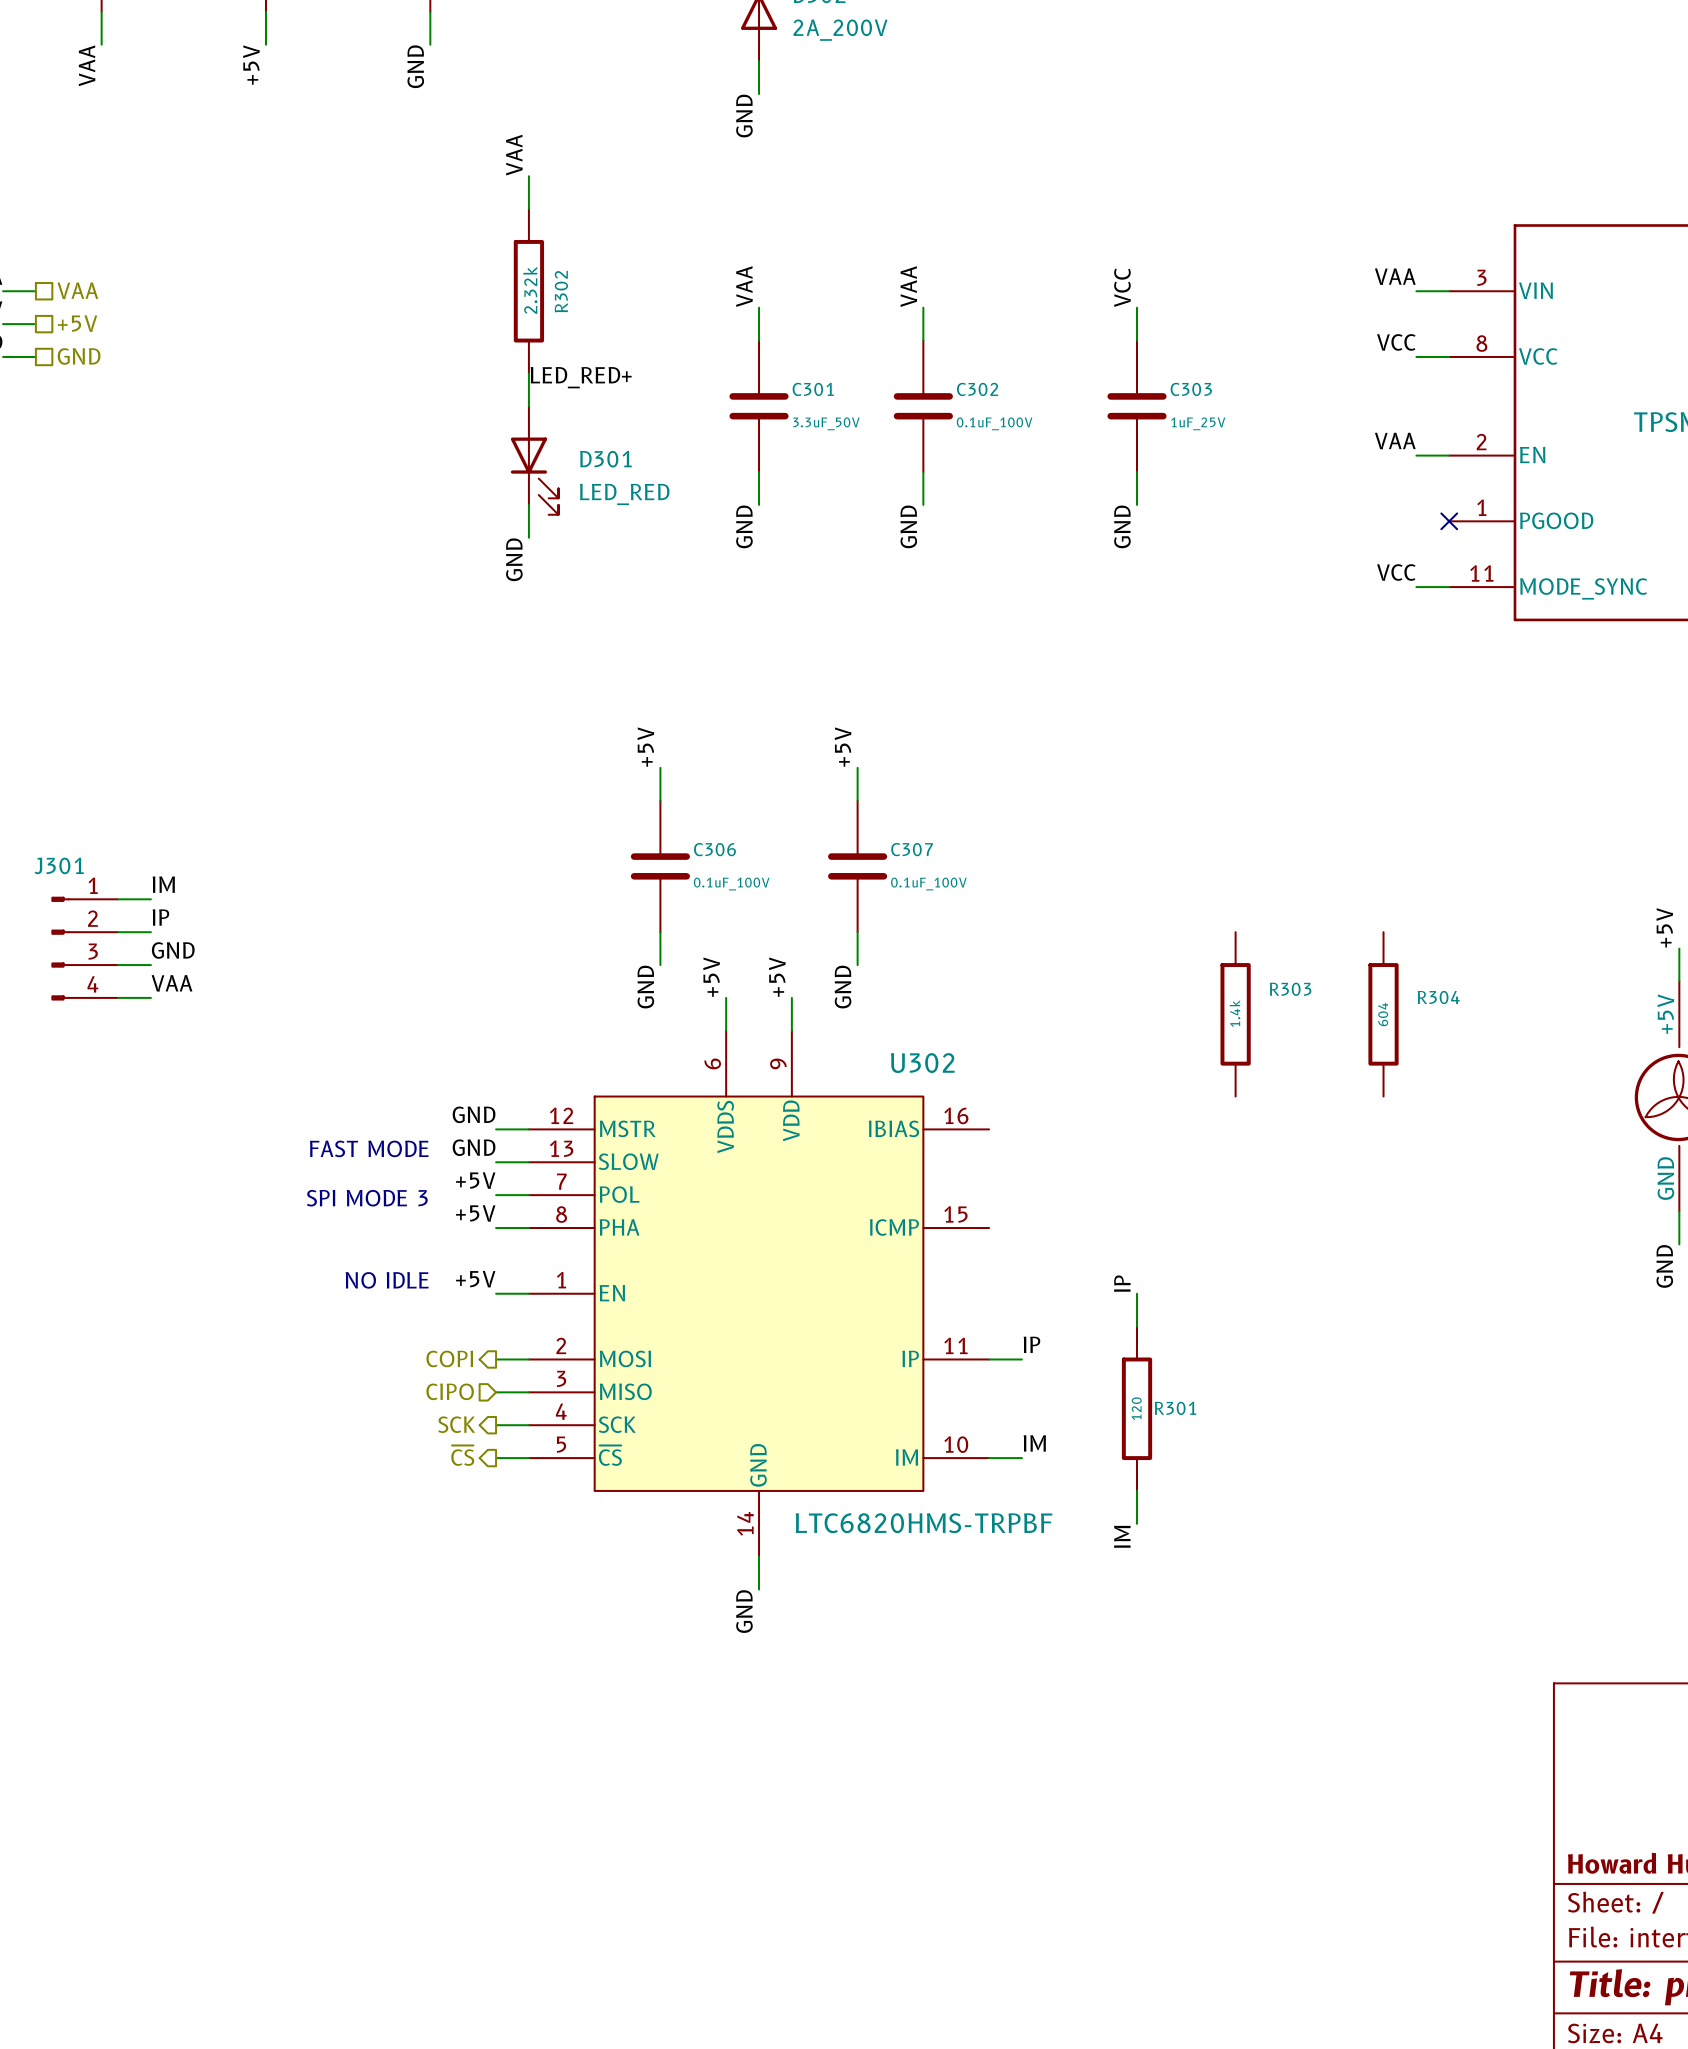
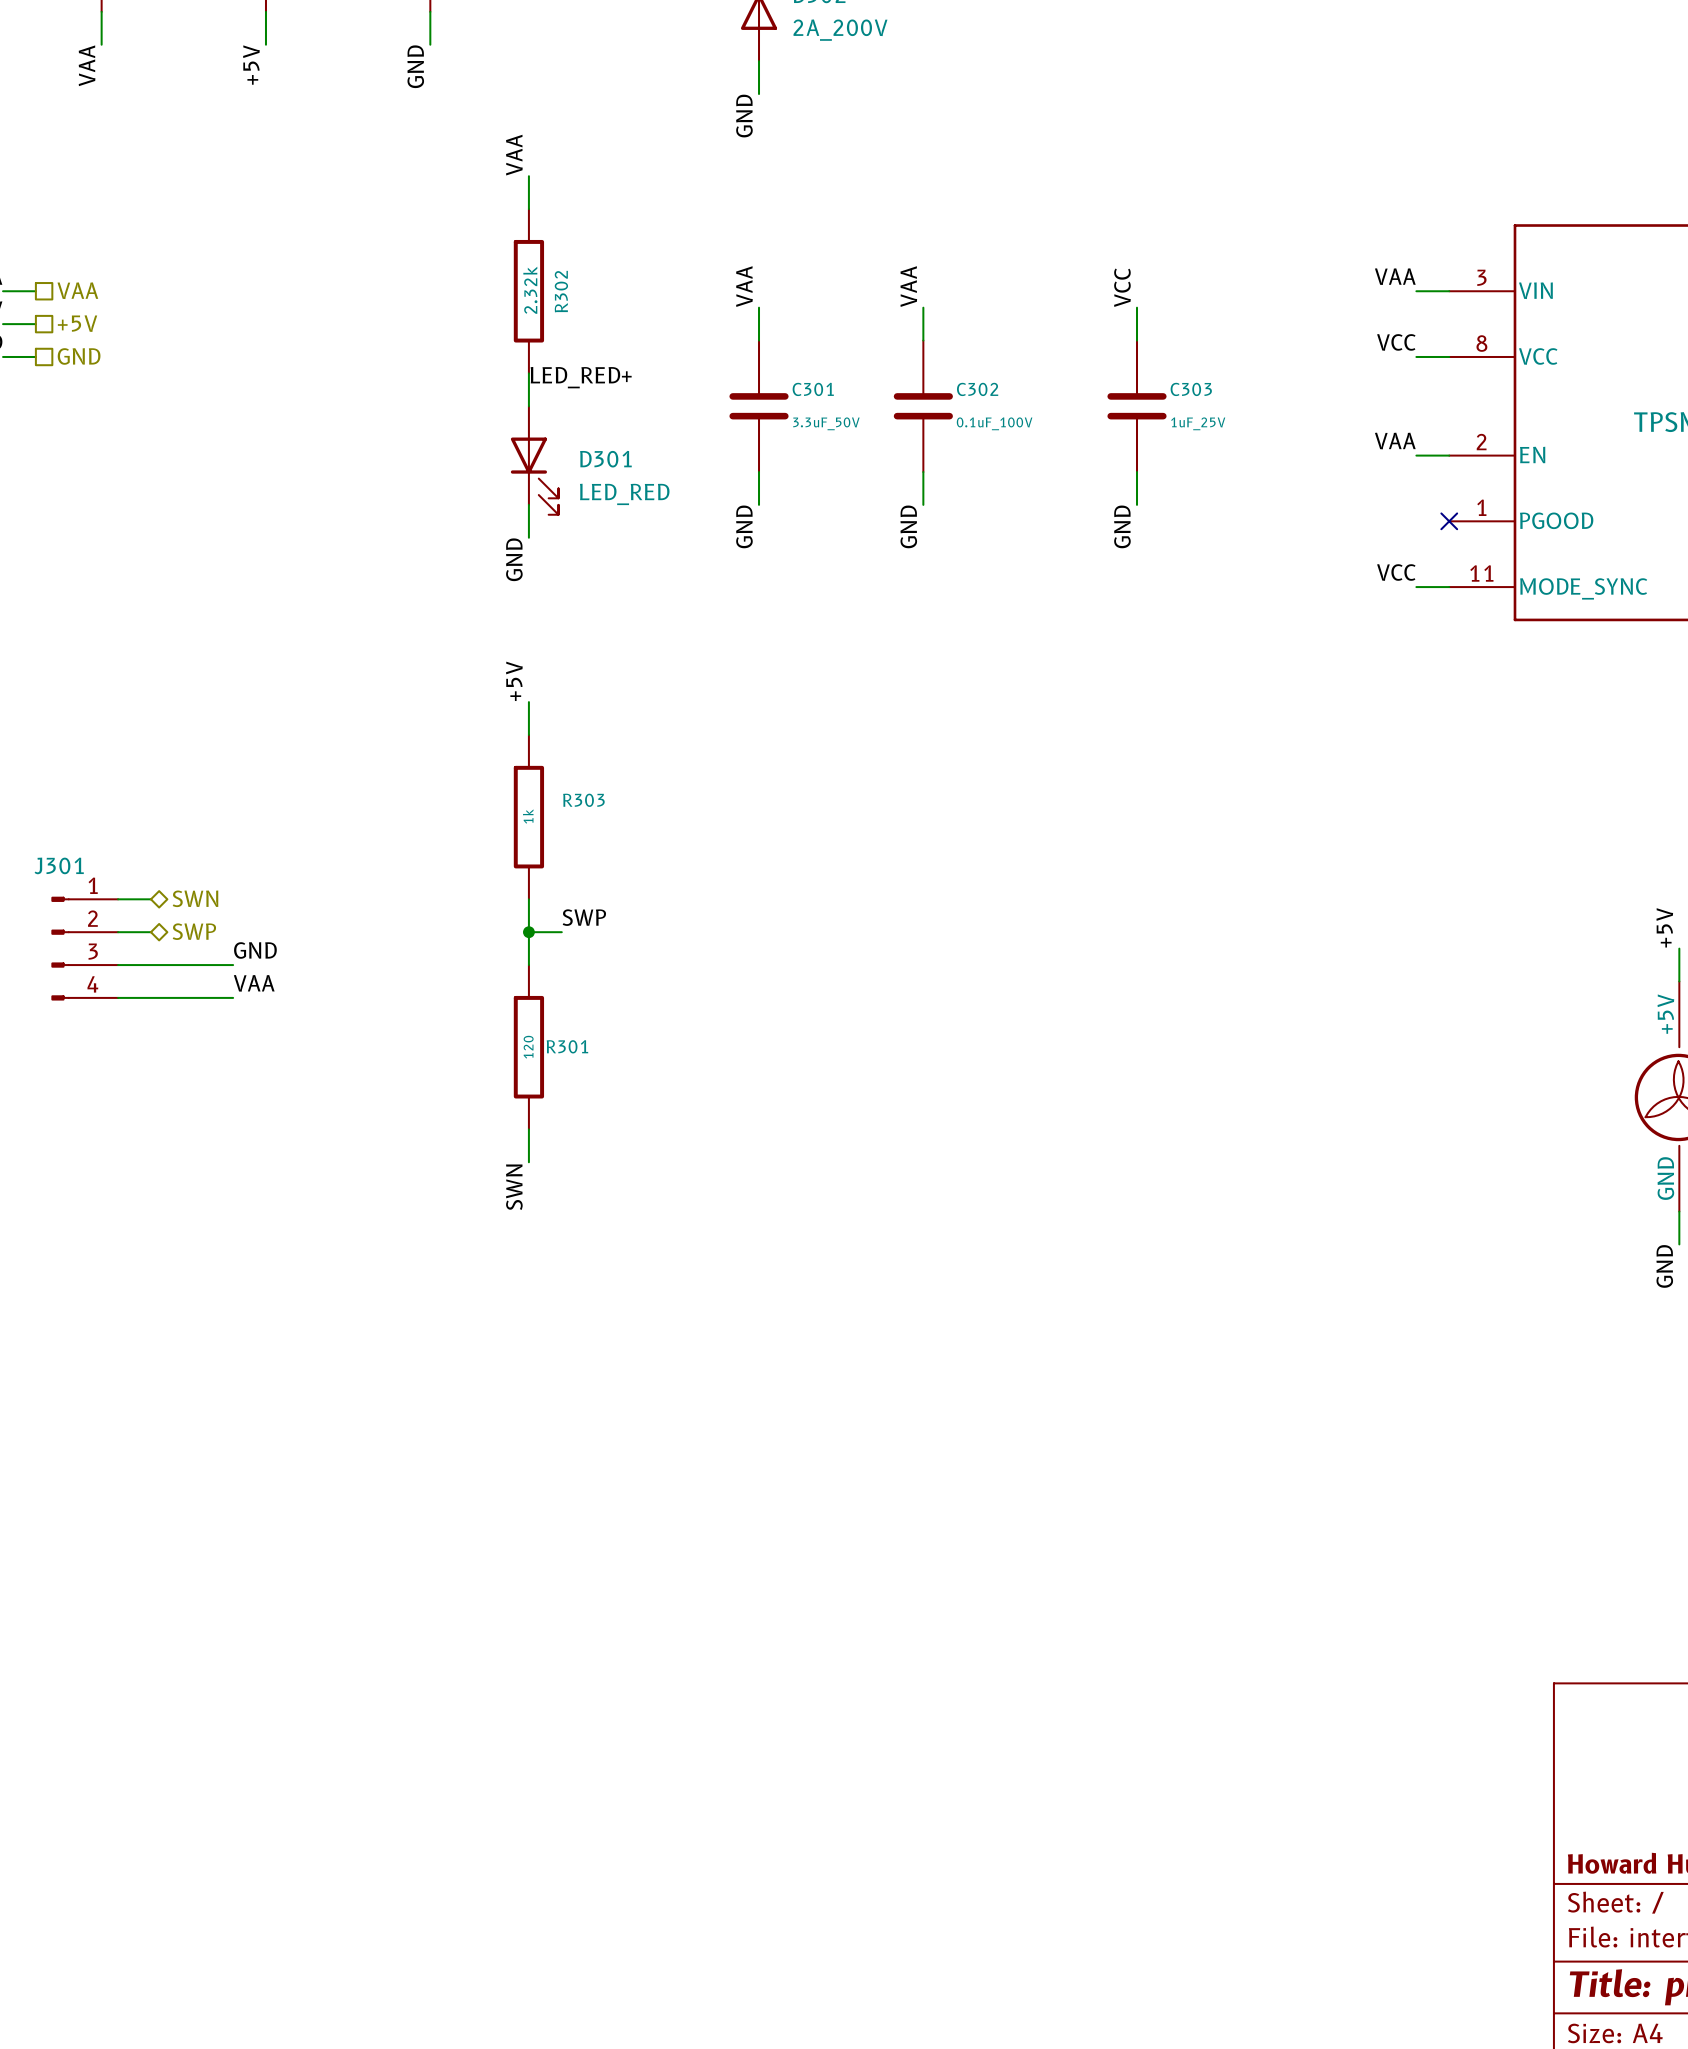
label position: +5V (645, 747) -> +5V (514, 681)
label: +5V (843, 747) -> none
wire: (660, 767) (660, 800) -> (528, 702) (528, 734)
wire: (857, 767) (857, 800) -> none
C306: 0.1uF_100V (660, 866) -> none
C307: 0.1uF_100V (857, 866) -> none
label: IM (163, 884) -> none
hierarchical label: none -> SWN (195, 898)
wire: none -> (528, 899) (528, 965)
label: IP (160, 917) -> none
label: none -> SWP (584, 917)
hierarchical label: none -> SWP (194, 931)
junction: none -> (528, 932)
wire: (660, 932) (660, 965) -> none
wire: (857, 932) (857, 965) -> none
label position: GND (173, 950) -> GND (255, 950)
wire: none -> (150, 965) (233, 965)
label: +5V (711, 977) -> none
label: +5V (777, 977) -> none
label position: VAA (172, 983) -> VAA (254, 983)
label: GND (645, 987) -> none
label: GND (843, 987) -> none
R303 name position: R303 (1290, 989) -> R303 (583, 800)
wire: none -> (150, 997) (233, 997)
wire: (726, 997) (726, 1030) -> none
wire: (791, 997) (791, 1030) -> none
R303 value: 1.4k (1234, 1013) -> 1k (528, 816)
R303 position: (1235, 1014) -> (528, 817)
R304: 604 (1383, 1014) -> none
label: GND (474, 1114) -> none
wire: (496, 1129) (528, 1129) -> (528, 1162) (528, 1129)
label: GND (474, 1147) -> none
text: FAST MODE (369, 1148) -> none
wire: (496, 1162) (528, 1162) -> (528, 932) (561, 932)
label: +5V (475, 1180) -> none
label: none -> SWN (514, 1187)
wire: (496, 1195) (528, 1195) -> none
text: SPI MODE 3 (367, 1198) -> none
label: +5V (475, 1213) -> none
wire: (496, 1228) (528, 1228) -> none
label: +5V (475, 1279) -> none
text: NO IDLE (387, 1280) -> none
label: IP (1122, 1283) -> none
wire: (496, 1293) (528, 1293) -> none
U302: LTC6820HMS-TRPBF (759, 1293) -> none
wire: (1137, 1293) (1137, 1326) -> none
label: IP (1031, 1344) -> none
hierarchical label: COPI (449, 1358) -> none
wire: (496, 1359) (528, 1359) -> none
wire: (989, 1359) (1021, 1359) -> none
hierarchical label: CIPO (450, 1391) -> none
wire: (496, 1392) (528, 1392) -> none
R301 position: (1137, 1408) -> (528, 1047)
hierarchical label: SCK (456, 1424) -> none
wire: (496, 1425) (528, 1425) -> none
label: IM (1034, 1443) -> none
hierarchical label: ~{CS} (462, 1455) -> none
wire: (496, 1458) (528, 1458) -> none
wire: (989, 1458) (1021, 1458) -> none
wire: (1137, 1490) (1137, 1523) -> none
label: IM (1122, 1536) -> none
wire: (759, 1556) (759, 1589) -> none
label: GND (744, 1611) -> none

